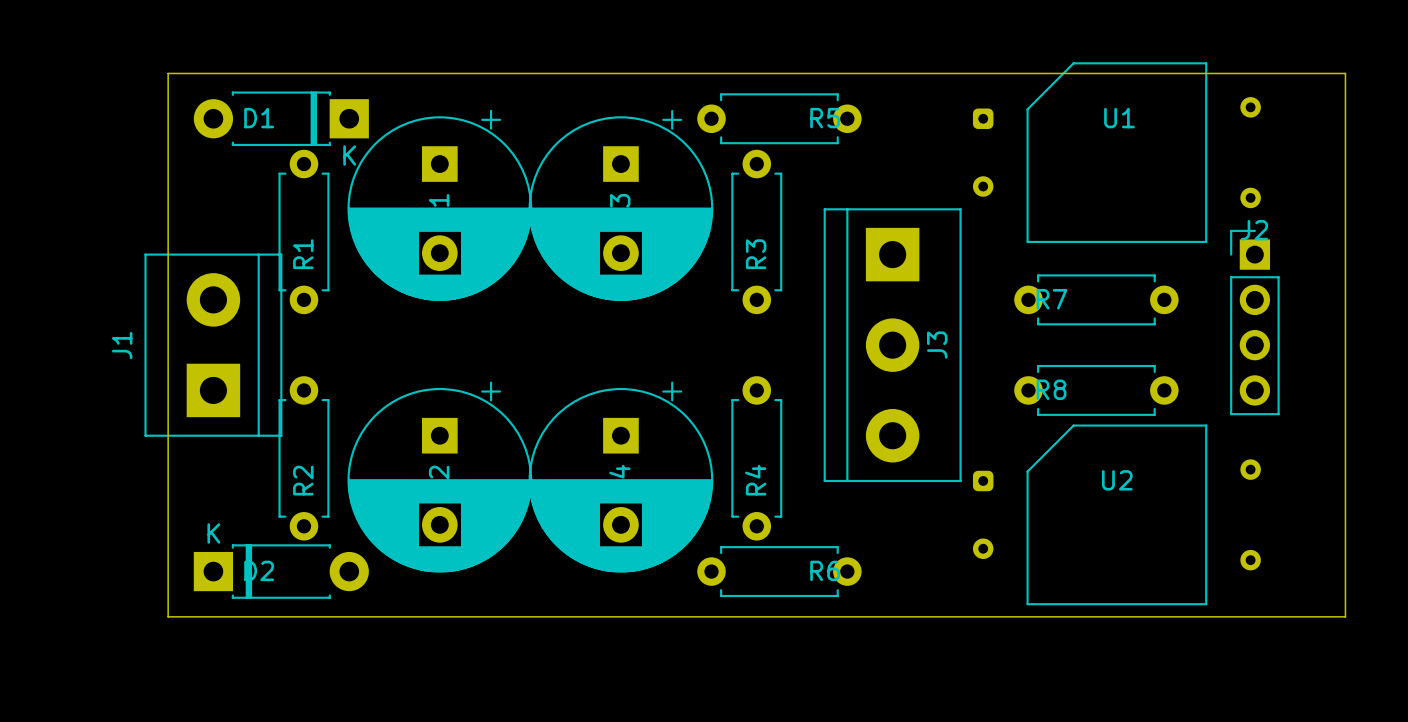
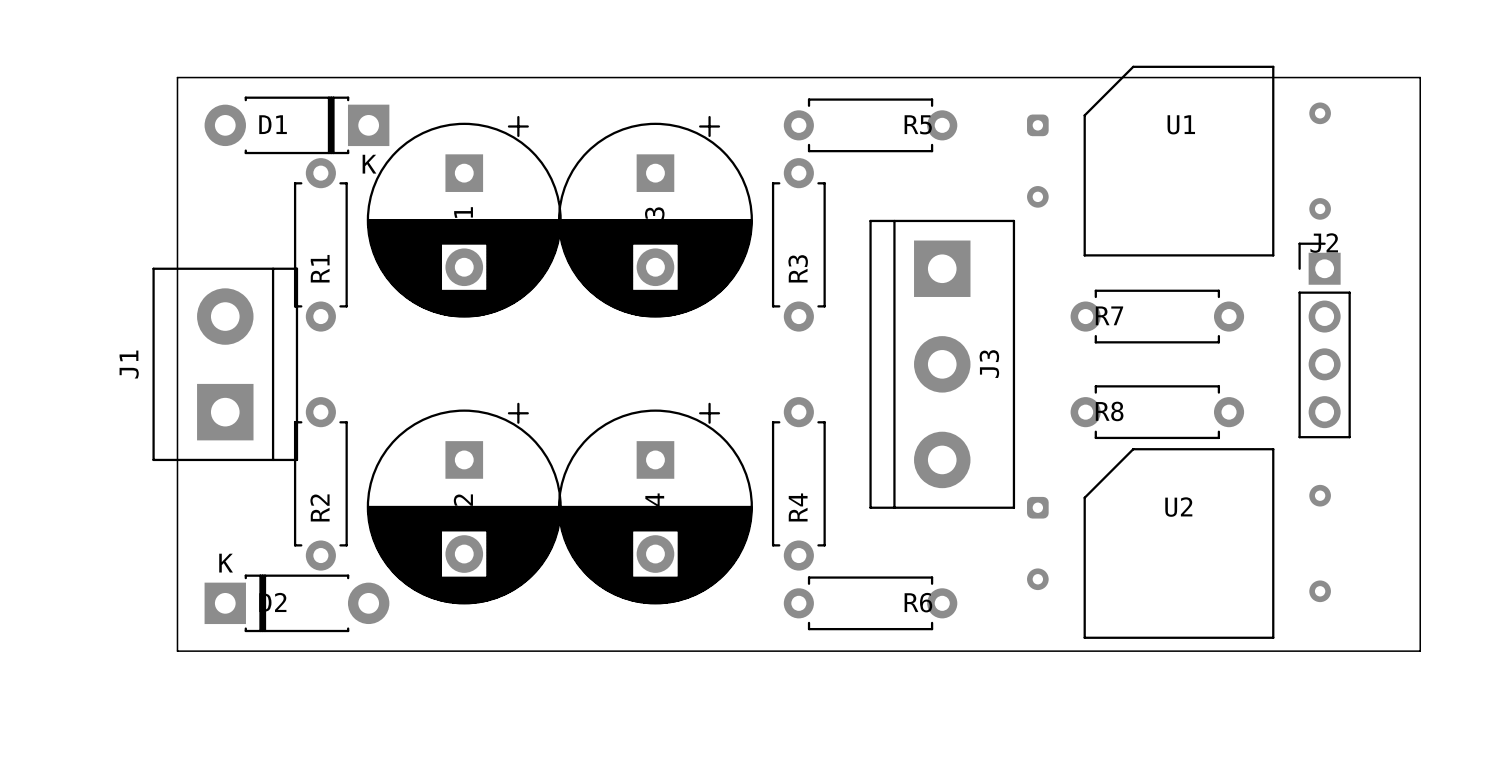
R5 position: (779, 118) -> (870, 125)
R6 position: (779, 571) -> (870, 603)

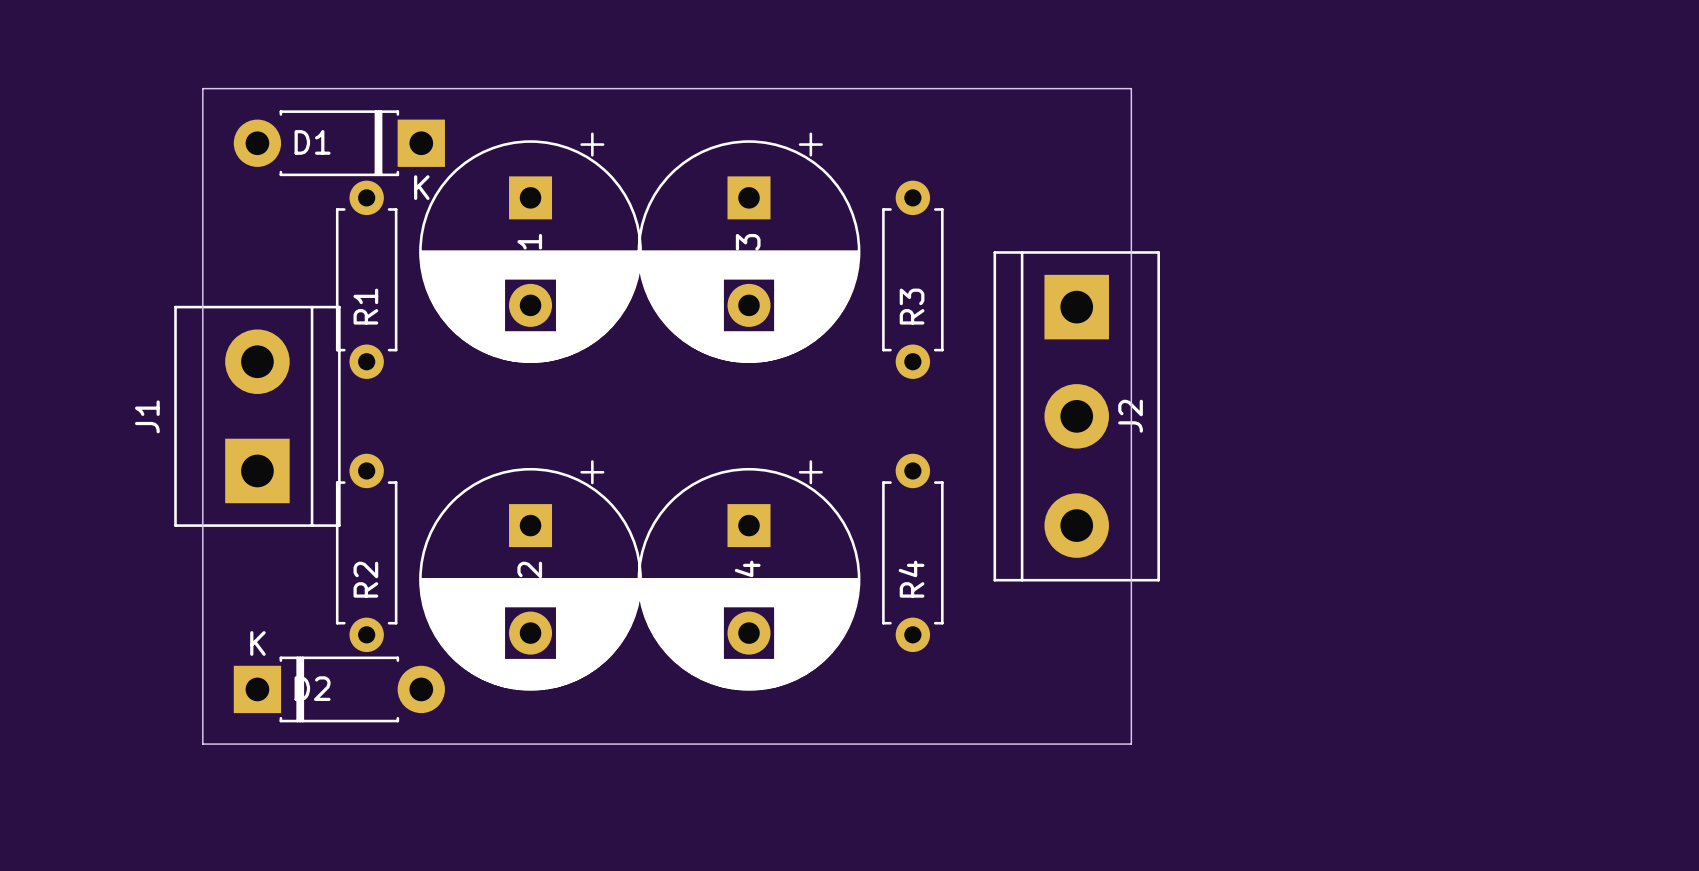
board edge: (990, 77) (1420, 77) (1420, 651) (990, 651) -> (1131, 88) (1131, 744)
R5: (870, 125) -> none
U1: (1178, 161) -> none
R7: (1157, 316) -> none
J2: (1324, 340) -> none
J3 name: J3 (989, 364) -> J2 (1130, 416)
R8: (1157, 412) -> none
U2: (1178, 543) -> none
R6: (870, 603) -> none

